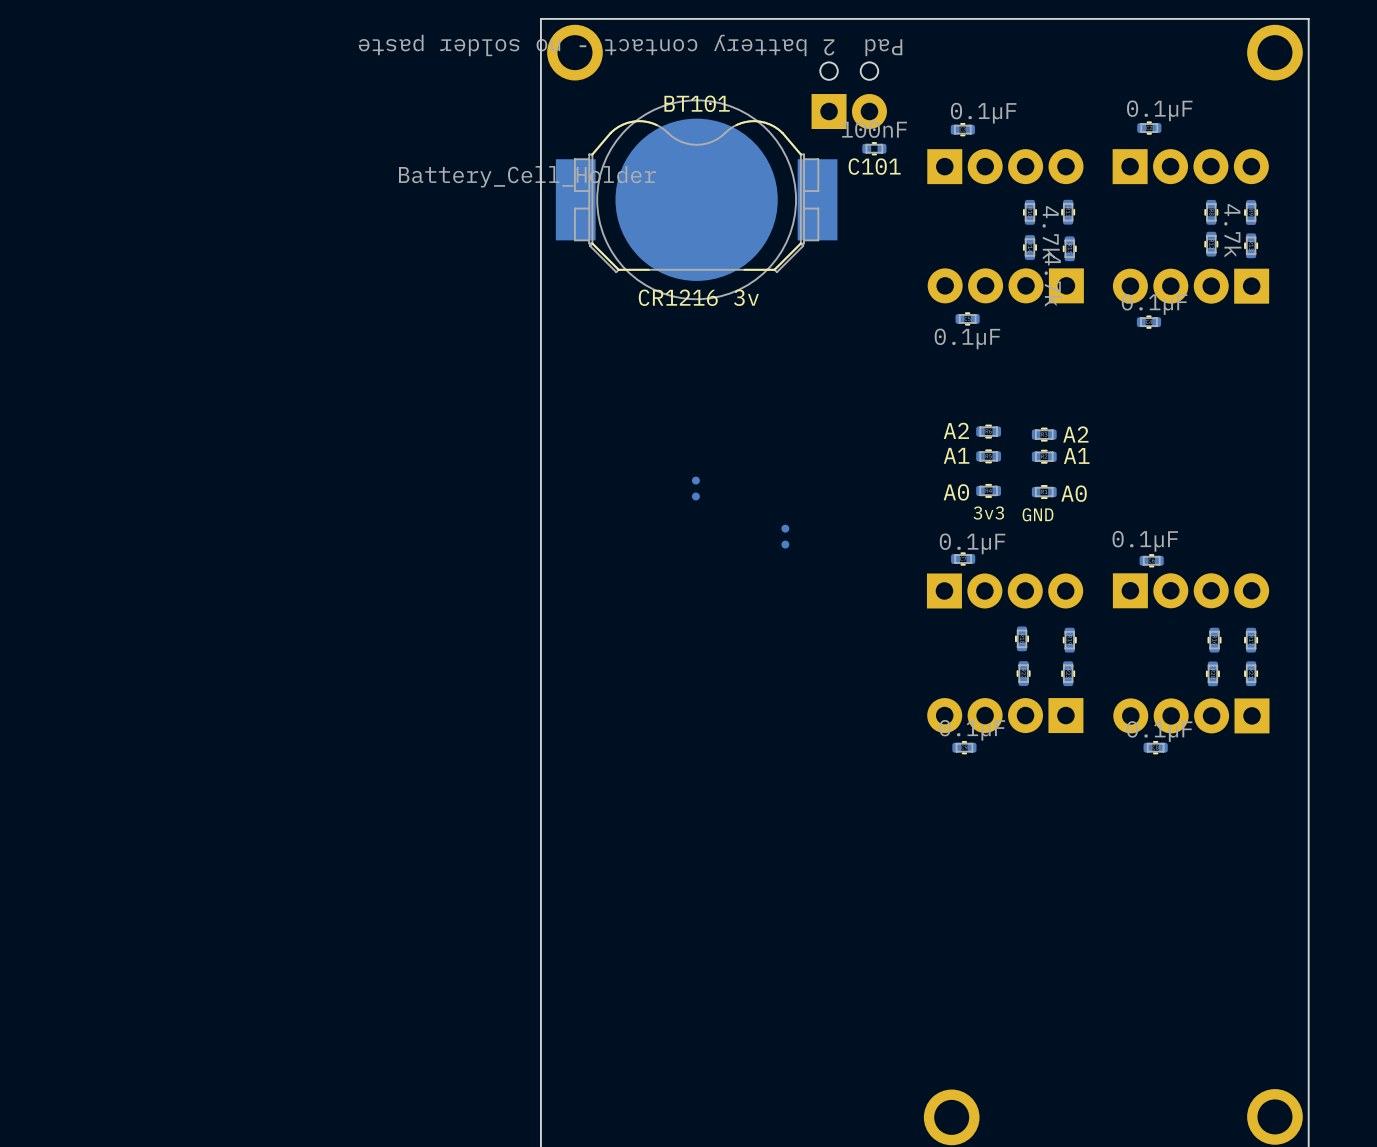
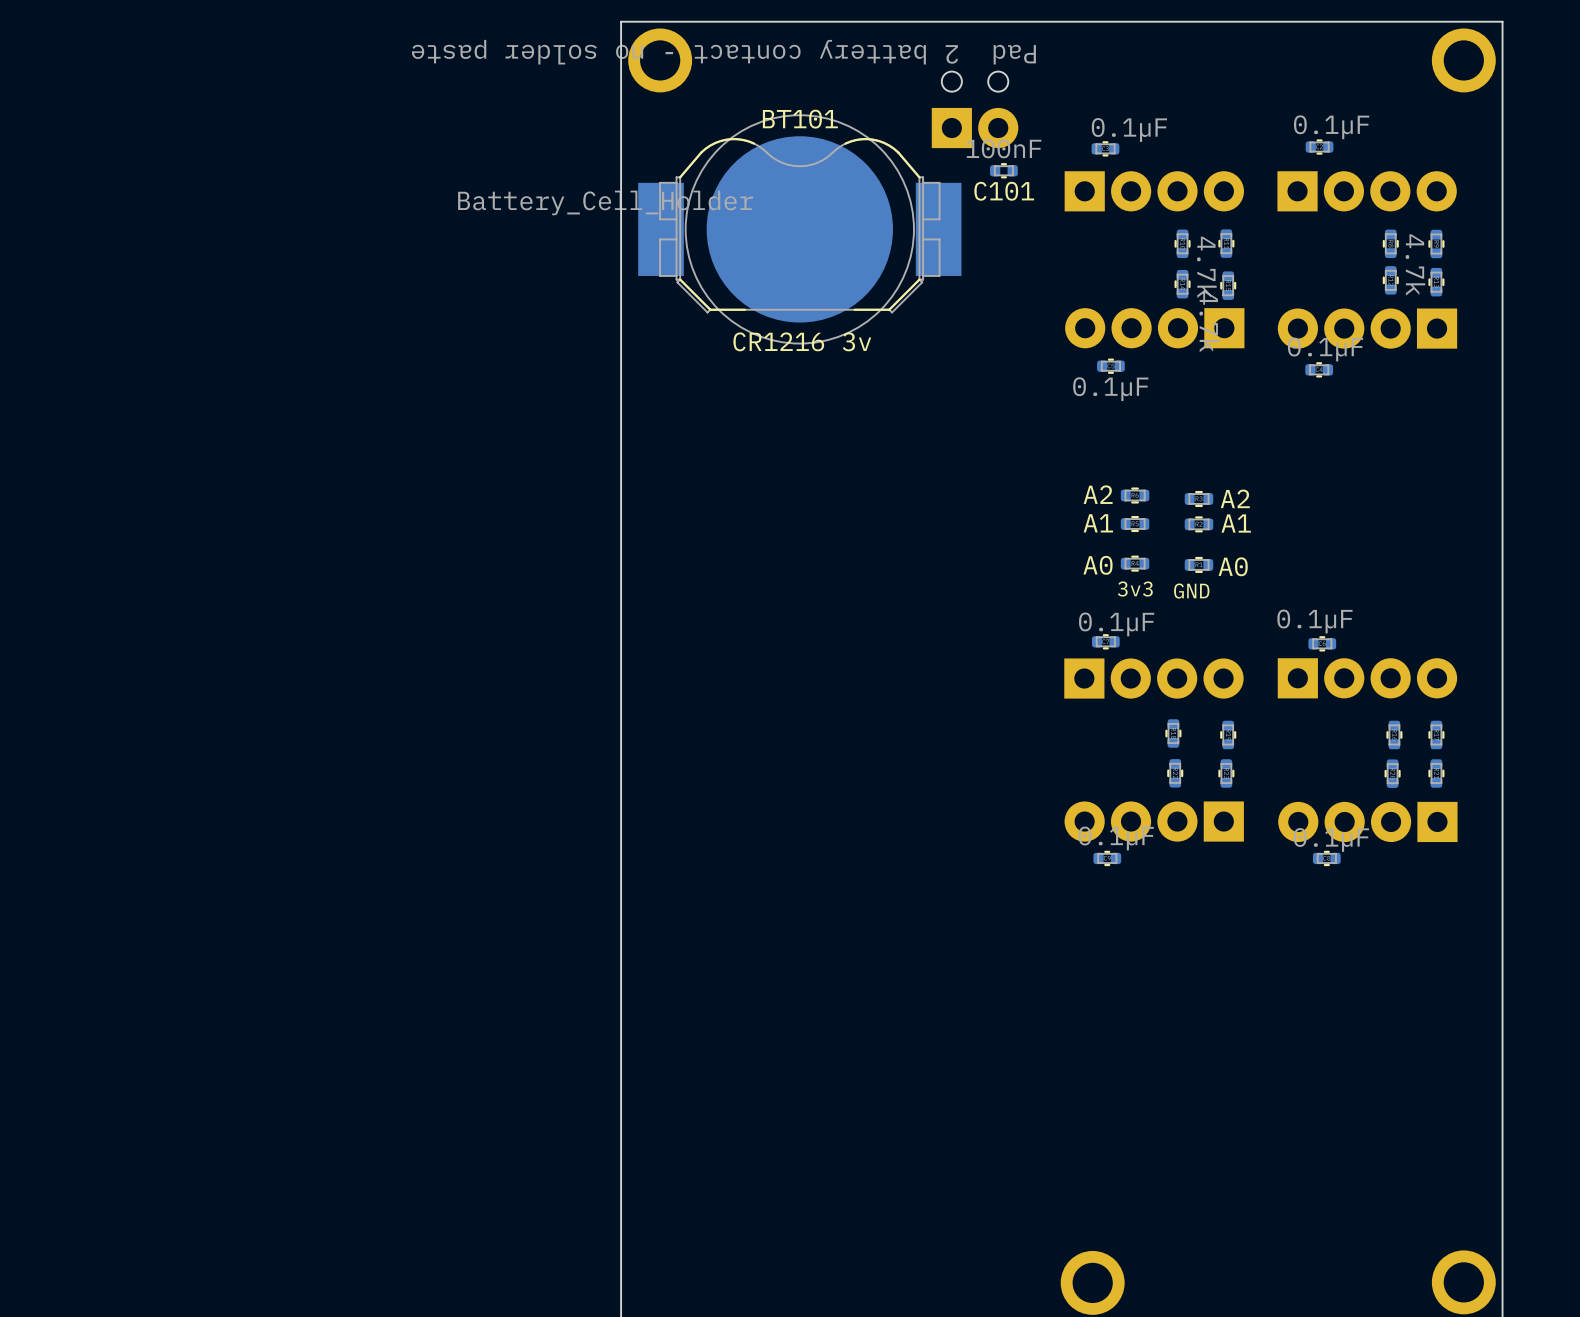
part: (695, 488) -> none
part: (785, 536) -> none

